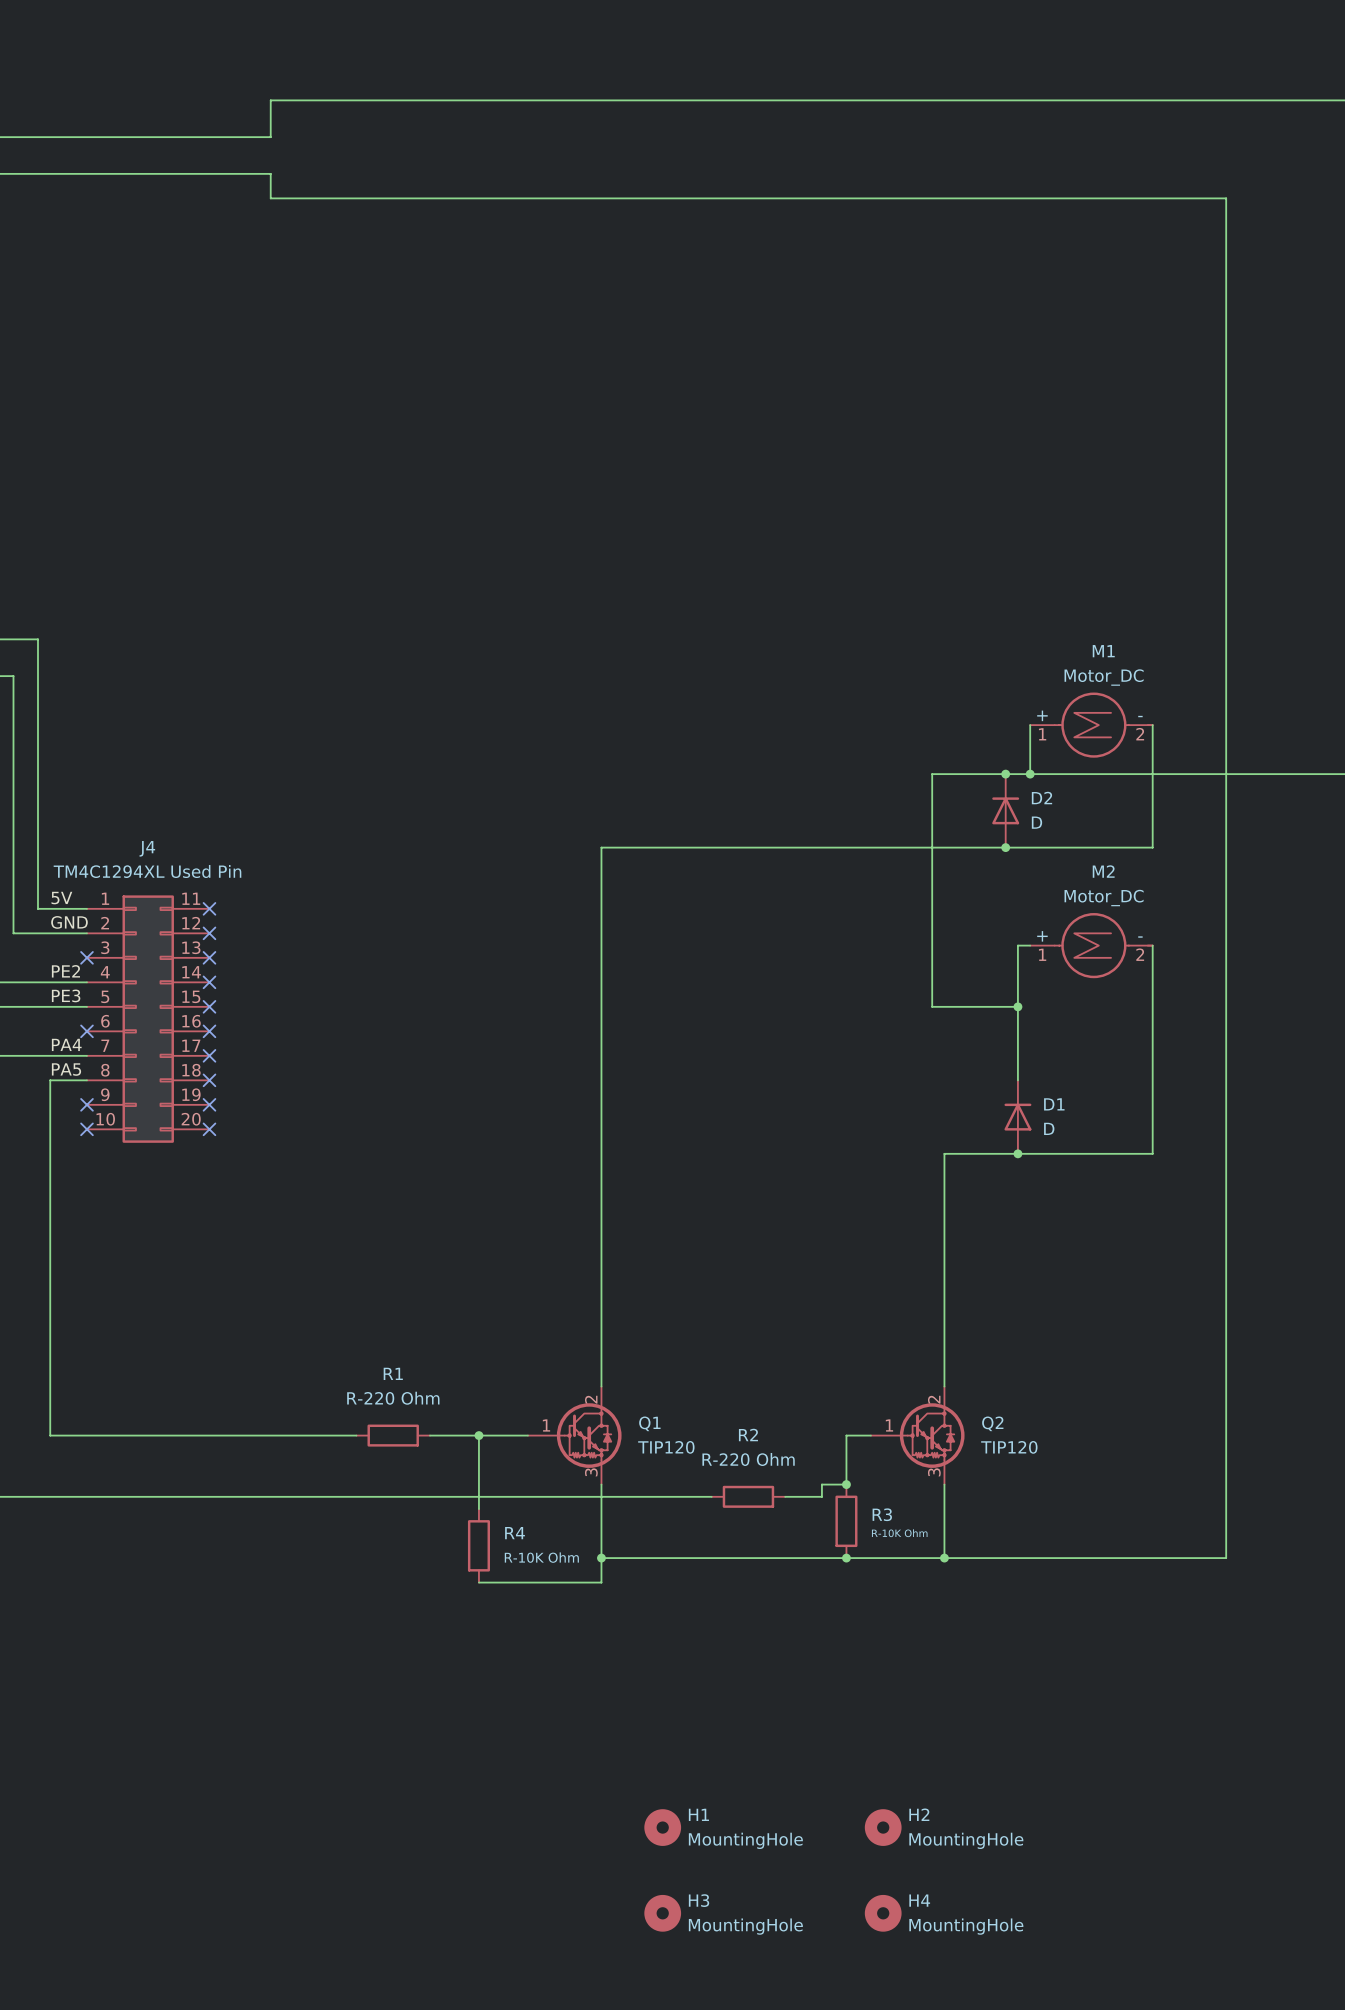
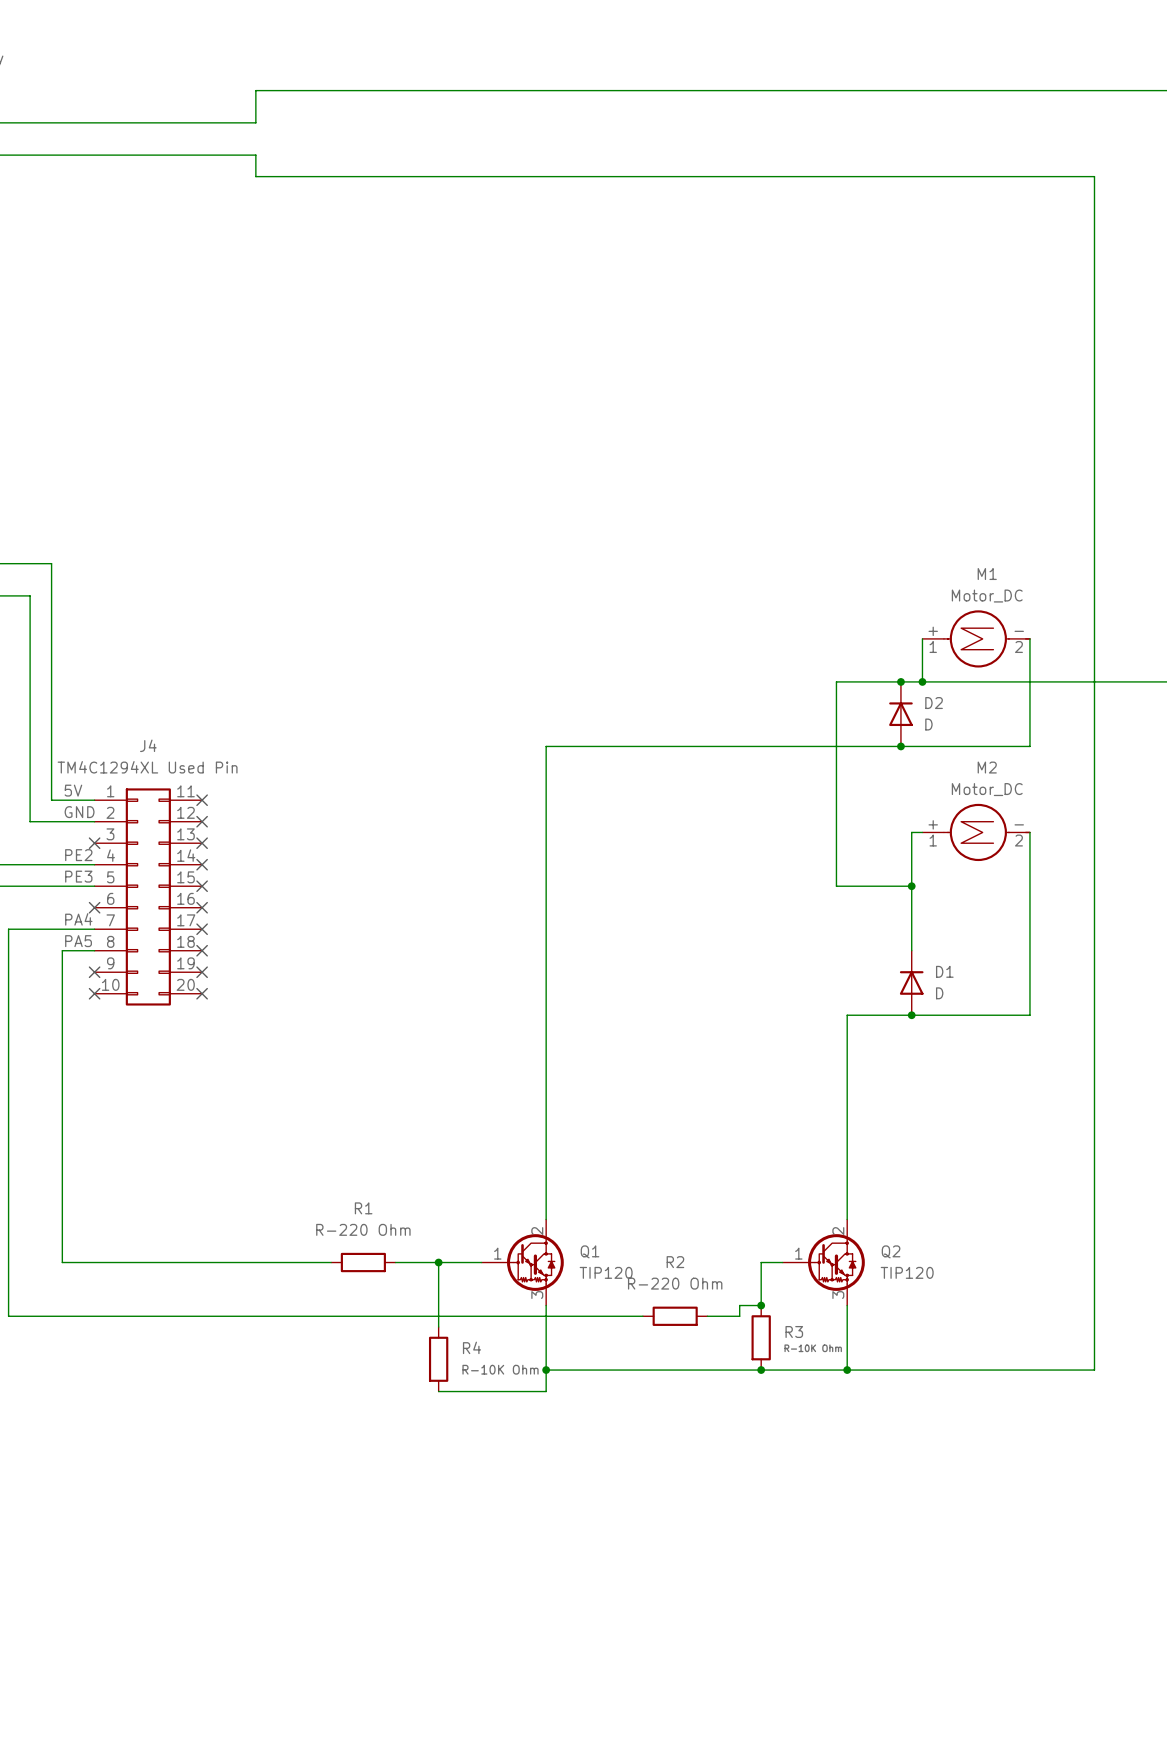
H1: MountingHole (662, 1827) -> none
H2: MountingHole (883, 1827) -> none
H3: MountingHole (662, 1913) -> none
H4: MountingHole (883, 1913) -> none

